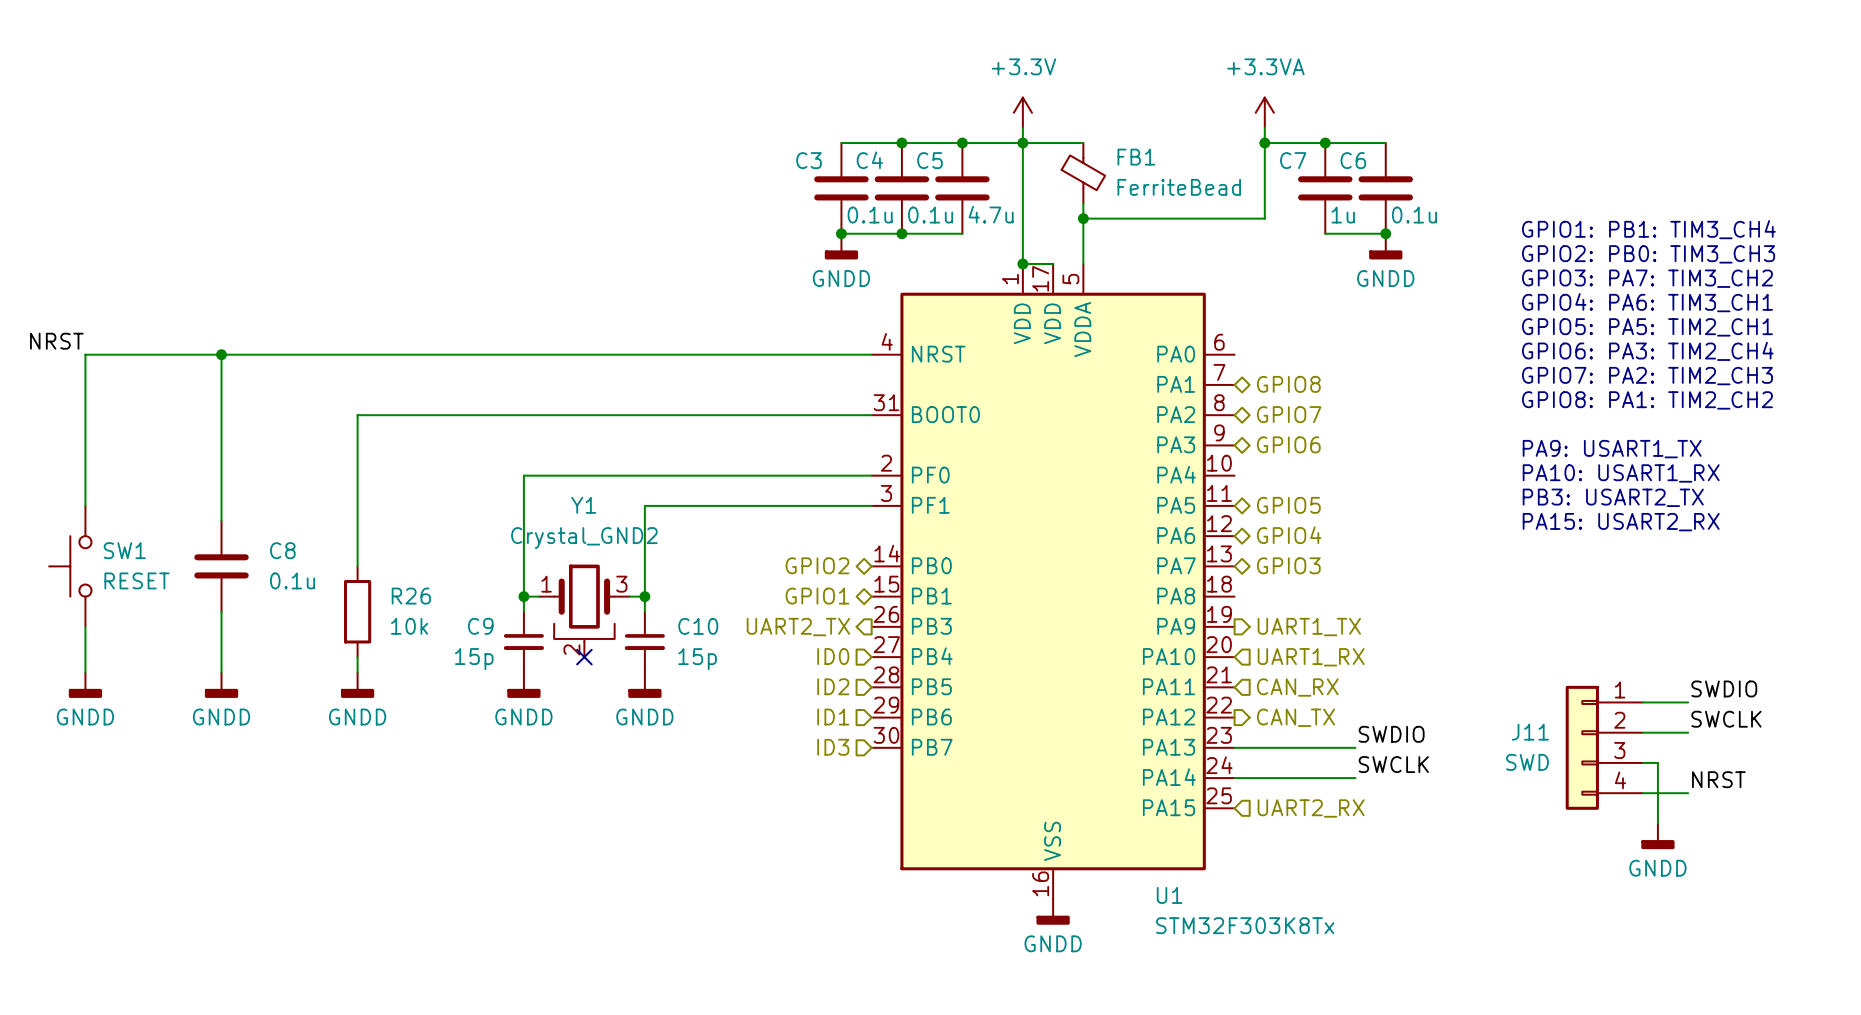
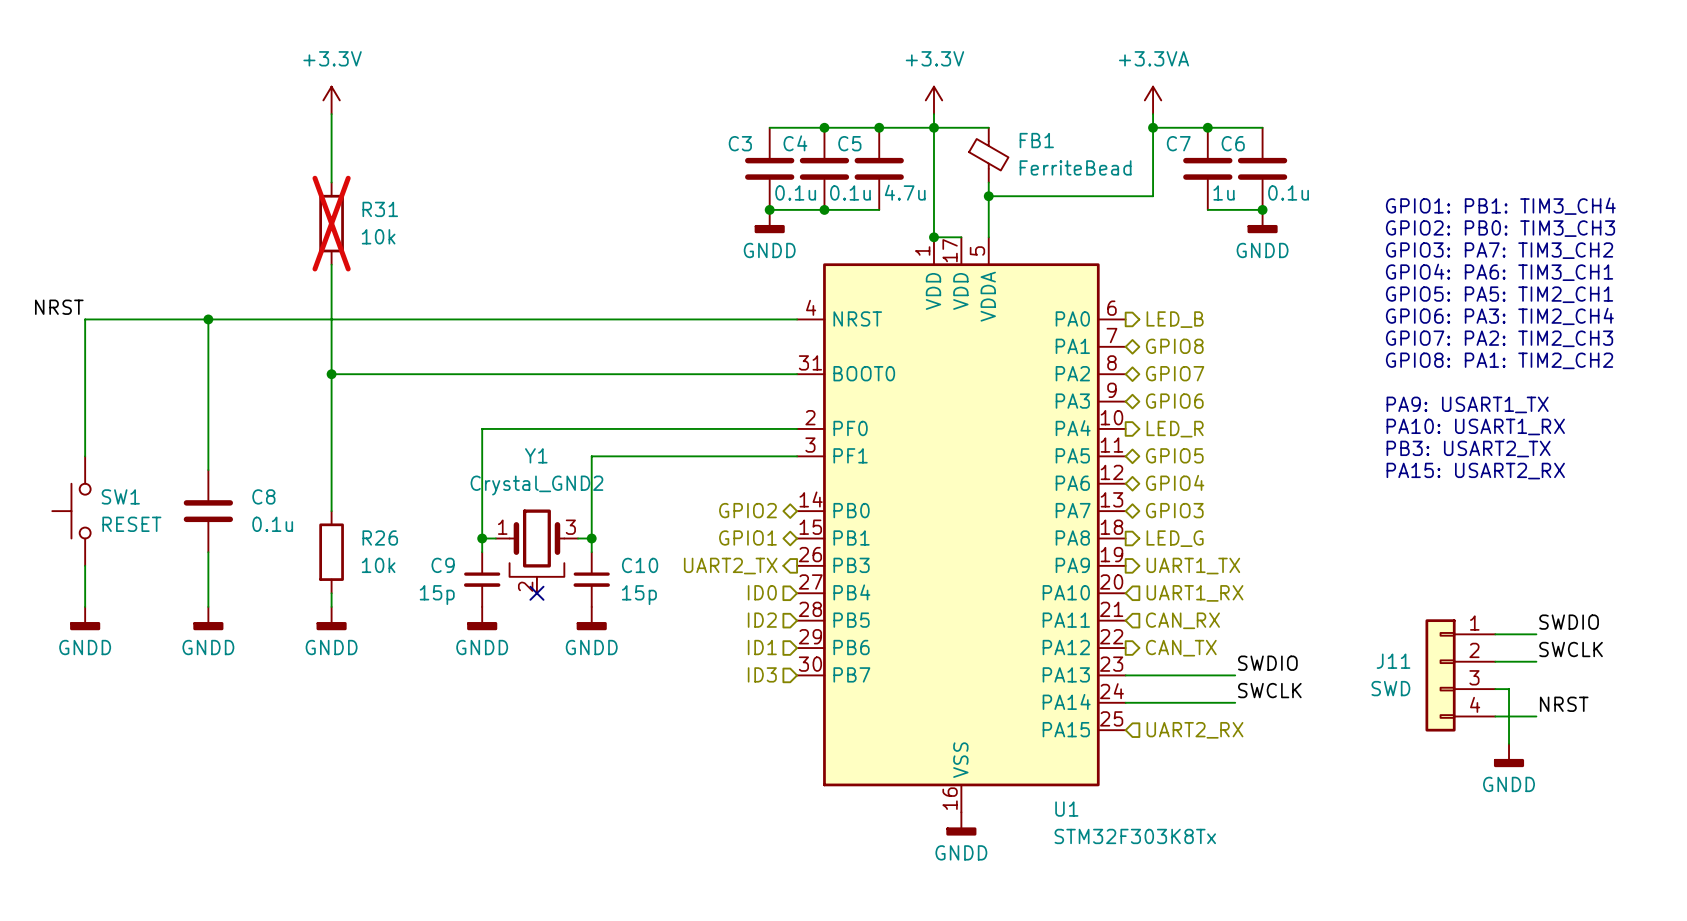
power symbol: none -> +3.3V (331, 100)
wire: none -> (331, 114) (331, 182)
R31: none -> 10k (331, 223)
wire: none -> (331, 264) (331, 374)
hierarchical label: none -> LED_B (1175, 319)
junction: none -> (331, 374)
hierarchical label: none -> LED_R (1175, 429)
hierarchical label: none -> LED_G (1175, 538)

